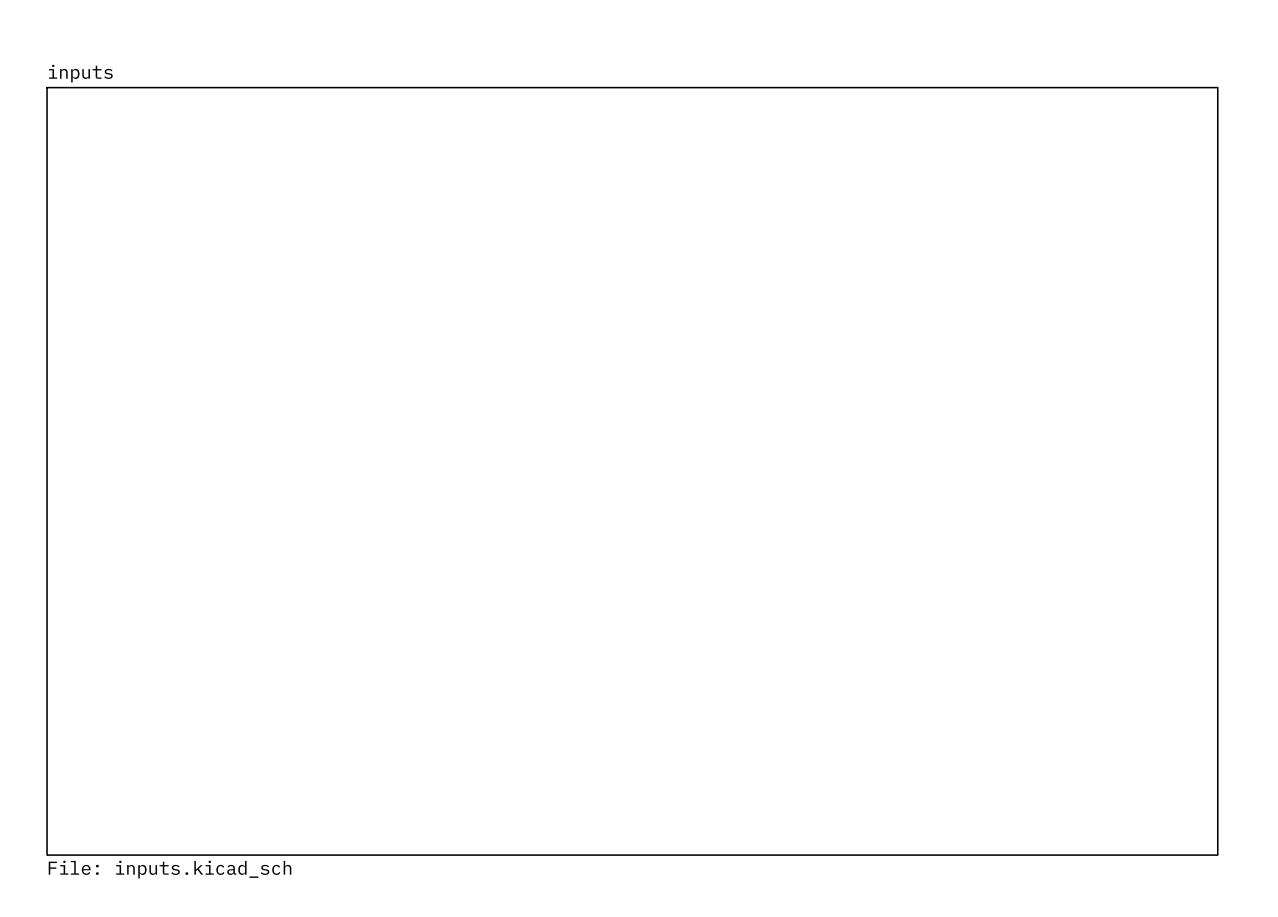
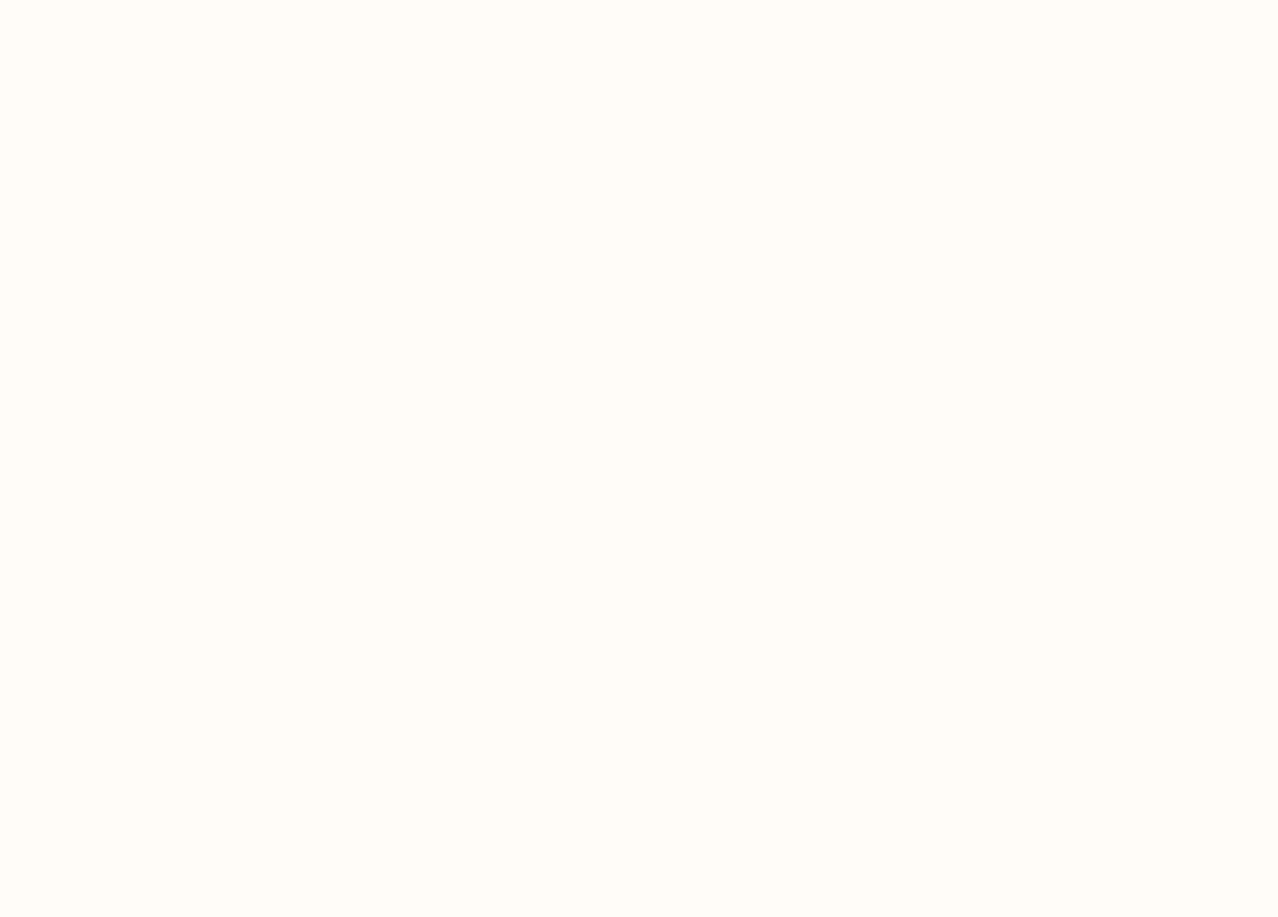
sheet inputs: File: inputs.kicad_sch (632, 471) -> none

